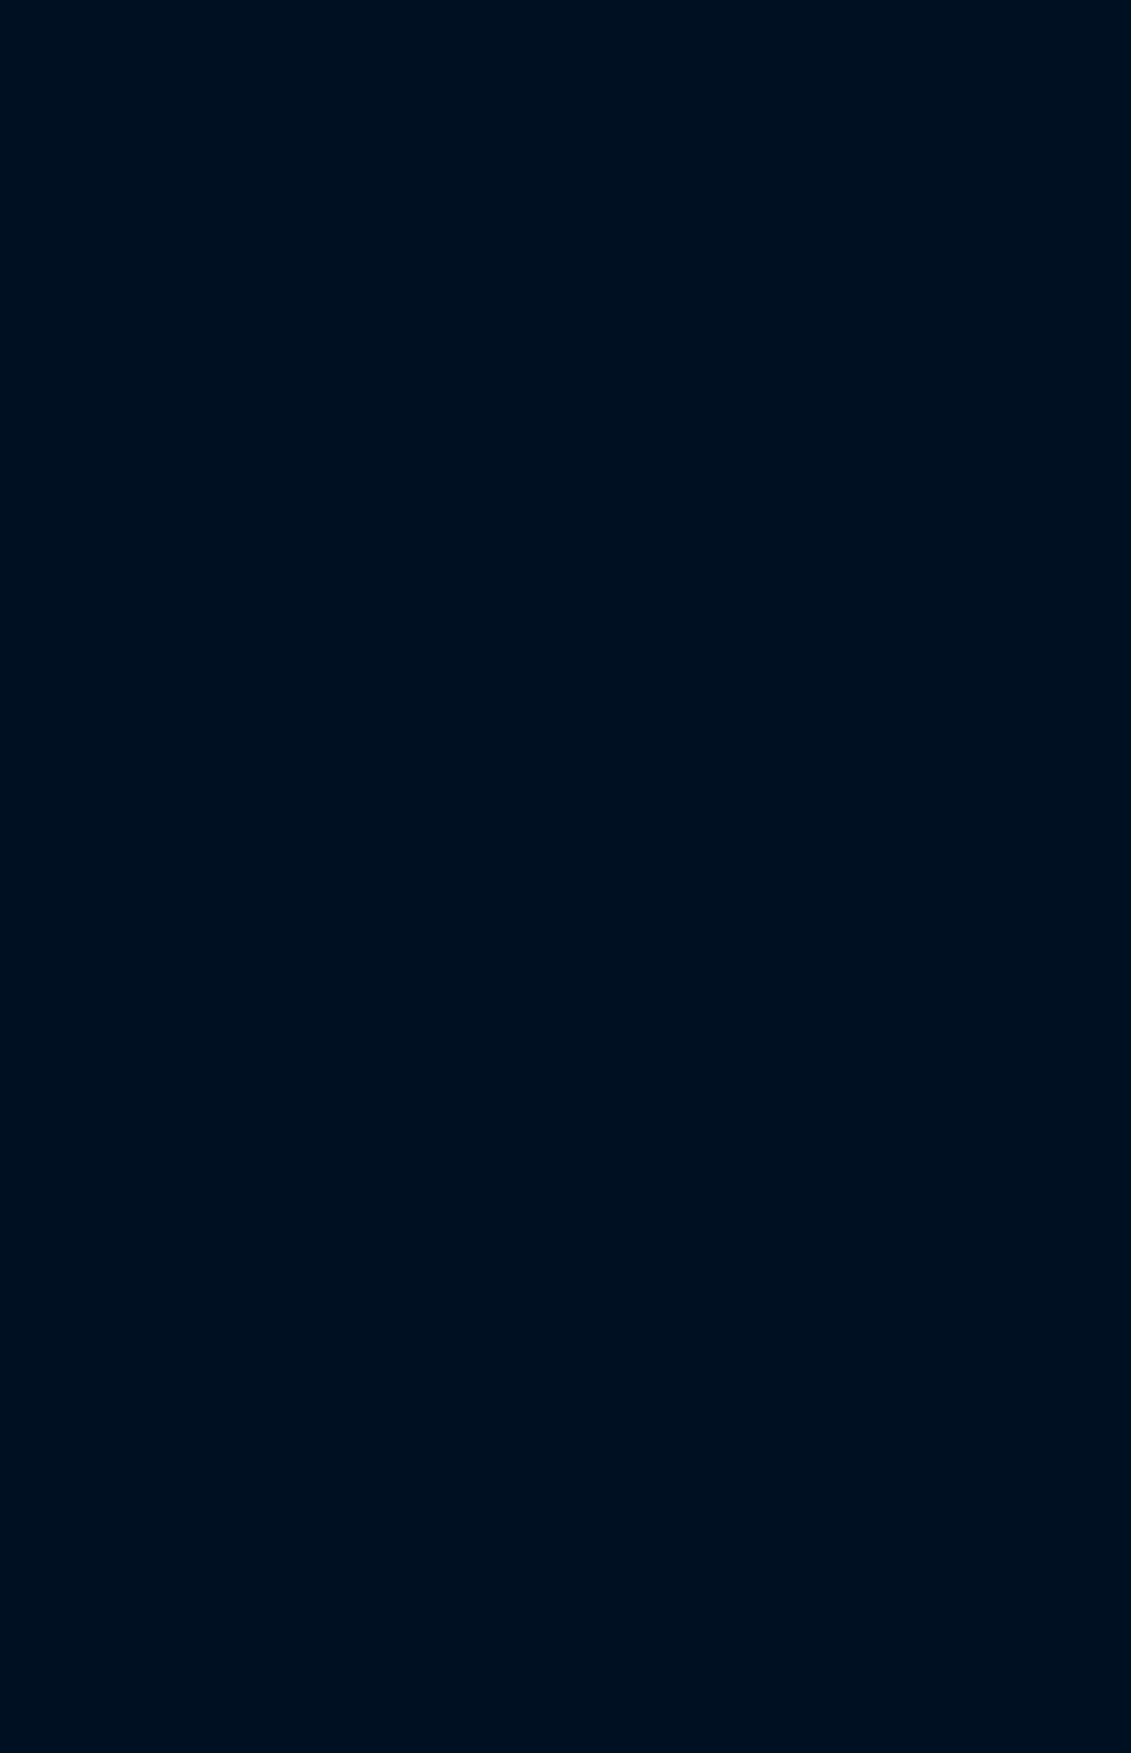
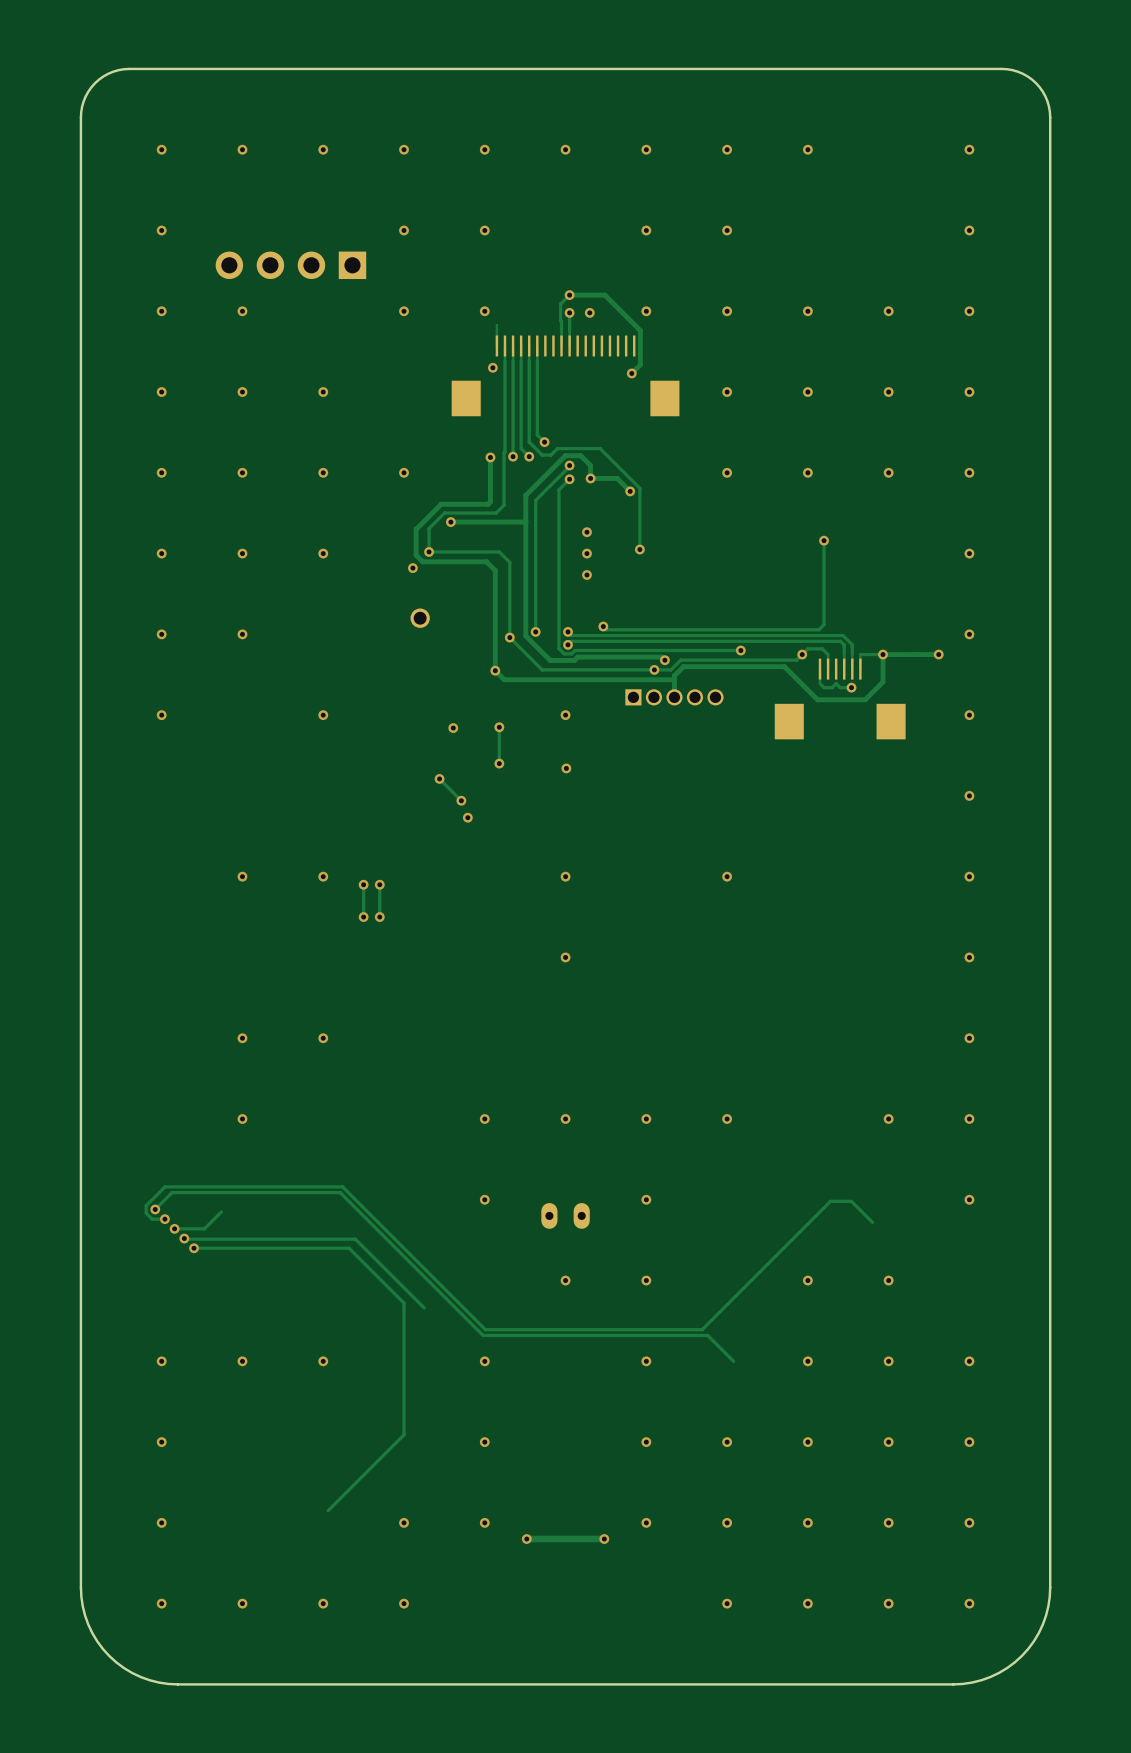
board edge: none -> (1001, 68) (129, 68) (113, 71) (103, 76) (95, 83) (85, 96) (80, 117) (80, 1587) (85, 1615) (97, 1641) (116, 1662) (132, 1672) (149, 1680) (177, 1684) (953, 1684) (981, 1680) (1007, 1668) (1021, 1656) (1038, 1633) (1048, 1606) (1050, 1587) (1050, 117) (1045, 96) (1036, 83) (1017, 71) (1001, 68)
via: none -> (161, 149)
via: none -> (242, 149)
via: none -> (323, 149)
via: none -> (404, 149)
via: none -> (484, 149)
via: none -> (565, 149)
via: none -> (646, 149)
via: none -> (727, 149)
via: none -> (807, 149)
via: none -> (969, 149)
via: none -> (161, 230)
via: none -> (404, 230)
via: none -> (484, 230)
via: none -> (646, 230)
via: none -> (727, 230)
via: none -> (969, 230)
part: none -> (290, 265)
via: none -> (569, 295)
via: none -> (161, 311)
via: none -> (242, 311)
via: none -> (404, 311)
via: none -> (484, 311)
via: none -> (646, 311)
via: none -> (727, 311)
via: none -> (807, 311)
via: none -> (888, 311)
via: none -> (969, 311)
track: none -> (569, 312) (569, 345)
via: none -> (569, 312)
via: none -> (589, 312)
track: none -> (496, 324) (496, 345)
track: none -> (504, 345) (504, 505) (496, 513) (444, 513) (429, 528) (429, 551) (499, 551) (509, 562) (509, 637) (542, 669) (670, 669) (680, 660) (796, 660) (807, 648) (822, 648) (828, 654) (828, 669)
track: none -> (513, 345) (513, 456)
track: none -> (521, 345) (521, 448) (529, 456)
track: none -> (529, 345) (529, 442) (542, 455) (551, 455) (557, 448) (600, 448) (639, 488) (639, 549)
track: none -> (537, 345) (537, 434) (544, 442)
track: none -> (561, 345) (560, 304) (569, 295) (604, 295) (640, 330) (640, 364) (631, 373)
via: none -> (492, 367)
via: none -> (631, 373)
part: none -> (565, 375)
via: none -> (161, 392)
via: none -> (242, 392)
via: none -> (323, 392)
via: none -> (727, 392)
via: none -> (807, 392)
via: none -> (888, 392)
via: none -> (969, 392)
via: none -> (544, 442)
via: none -> (513, 456)
via: none -> (529, 456)
track: none -> (490, 457) (490, 501) (488, 504) (441, 504) (416, 529) (416, 555) (422, 561) (486, 561) (495, 570) (495, 670) (504, 679) (674, 679)
via: none -> (490, 457)
track: none -> (569, 465) (535, 500) (535, 631)
via: none -> (569, 465)
via: none -> (161, 472)
via: none -> (242, 472)
via: none -> (323, 472)
via: none -> (404, 472)
via: none -> (727, 472)
via: none -> (807, 472)
via: none -> (888, 472)
via: none -> (969, 472)
via: none -> (590, 478)
track: none -> (569, 479) (558, 489) (558, 648) (564, 653) (571, 653) (575, 650) (740, 650)
via: none -> (569, 479)
track: none -> (630, 491) (617, 478) (590, 478) (590, 465) (580, 455) (565, 455) (525, 495) (525, 636) (550, 660) (574, 660) (577, 657) (661, 657) (664, 660)
via: none -> (630, 491)
via: none -> (450, 522)
track: none -> (525, 522) (450, 522)
via: none -> (586, 532)
track: none -> (824, 540) (824, 624) (818, 629) (606, 629) (603, 626)
via: none -> (824, 540)
via: none -> (639, 549)
via: none -> (429, 551)
via: none -> (161, 553)
via: none -> (242, 553)
via: none -> (323, 553)
via: none -> (586, 553)
via: none -> (969, 553)
via: none -> (412, 568)
via: none -> (586, 574)
part: none -> (420, 618)
via: none -> (603, 626)
via: none -> (535, 631)
track: none -> (567, 631) (571, 635) (843, 635) (852, 644) (852, 669)
via: none -> (567, 631)
via: none -> (161, 634)
via: none -> (242, 634)
via: none -> (969, 634)
via: none -> (509, 637)
track: none -> (567, 644) (571, 641) (840, 641) (844, 644) (844, 669)
via: none -> (567, 644)
via: none -> (740, 650)
via: none -> (802, 654)
track: none -> (883, 654) (860, 654) (860, 669)
track: none -> (883, 654) (883, 682) (865, 699) (817, 699) (784, 666) (683, 666) (674, 675) (674, 697)
via: none -> (883, 654)
track: none -> (938, 654) (883, 654)
via: none -> (938, 654)
via: none -> (664, 660)
via: none -> (654, 669)
track: none -> (820, 669) (820, 683) (824, 687) (832, 687) (836, 683) (840, 687) (851, 687)
via: none -> (495, 670)
via: none -> (851, 687)
part: none -> (674, 697)
part: none -> (840, 698)
via: none -> (161, 715)
via: none -> (323, 715)
via: none -> (565, 715)
via: none -> (969, 715)
track: none -> (499, 727) (499, 763)
via: none -> (499, 727)
via: none -> (453, 728)
via: none -> (499, 763)
via: none -> (566, 768)
track: none -> (439, 778) (461, 800)
via: none -> (439, 778)
via: none -> (969, 795)
via: none -> (461, 800)
via: none -> (467, 817)
via: none -> (242, 876)
via: none -> (323, 876)
via: none -> (565, 876)
via: none -> (727, 876)
via: none -> (969, 876)
track: none -> (363, 884) (363, 917)
via: none -> (363, 884)
track: none -> (379, 884) (379, 917)
via: none -> (379, 884)
via: none -> (363, 917)
via: none -> (379, 917)
via: none -> (565, 957)
via: none -> (969, 957)
via: none -> (242, 1038)
via: none -> (323, 1038)
via: none -> (969, 1038)
via: none -> (242, 1119)
via: none -> (484, 1119)
via: none -> (565, 1119)
via: none -> (646, 1119)
via: none -> (727, 1119)
via: none -> (888, 1119)
via: none -> (969, 1119)
via: none -> (484, 1199)
via: none -> (646, 1199)
via: none -> (969, 1199)
track: none -> (155, 1209) (172, 1192) (340, 1192) (483, 1335) (707, 1335) (733, 1361)
via: none -> (155, 1209)
track: none -> (221, 1211) (204, 1228) (174, 1228)
part: none -> (565, 1215)
track: none -> (164, 1219) (152, 1219) (146, 1213) (146, 1205) (165, 1186) (342, 1186) (485, 1329) (702, 1329) (830, 1201) (851, 1201) (872, 1222)
via: none -> (164, 1219)
via: none -> (174, 1228)
track: none -> (184, 1238) (355, 1239) (424, 1308)
via: none -> (184, 1238)
track: none -> (194, 1248) (349, 1248) (404, 1303) (404, 1434) (328, 1510)
via: none -> (194, 1248)
via: none -> (565, 1280)
via: none -> (646, 1280)
via: none -> (807, 1280)
via: none -> (888, 1280)
via: none -> (161, 1361)
via: none -> (242, 1361)
via: none -> (323, 1361)
via: none -> (484, 1361)
via: none -> (646, 1361)
via: none -> (807, 1361)
via: none -> (888, 1361)
via: none -> (969, 1361)
via: none -> (161, 1442)
via: none -> (484, 1442)
via: none -> (646, 1442)
via: none -> (727, 1442)
via: none -> (807, 1442)
via: none -> (888, 1442)
via: none -> (969, 1442)
via: none -> (161, 1522)
via: none -> (404, 1522)
via: none -> (484, 1522)
via: none -> (646, 1522)
via: none -> (727, 1522)
via: none -> (807, 1522)
via: none -> (888, 1522)
via: none -> (969, 1522)
via: none -> (526, 1539)
track: none -> (604, 1539) (526, 1539)
via: none -> (604, 1539)
via: none -> (161, 1603)
via: none -> (242, 1603)
via: none -> (323, 1603)
via: none -> (404, 1603)
via: none -> (727, 1603)
via: none -> (807, 1603)
via: none -> (888, 1603)
via: none -> (969, 1603)

